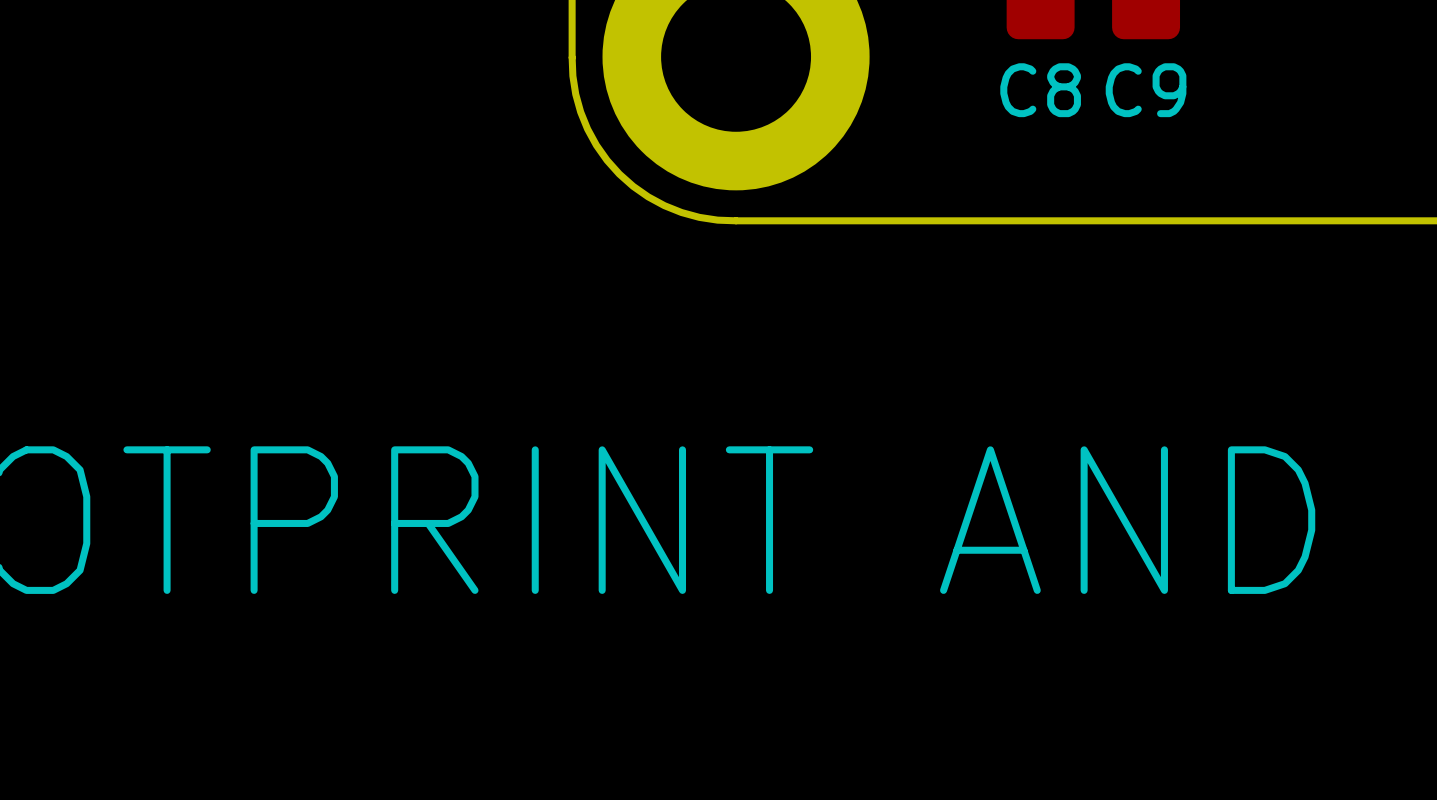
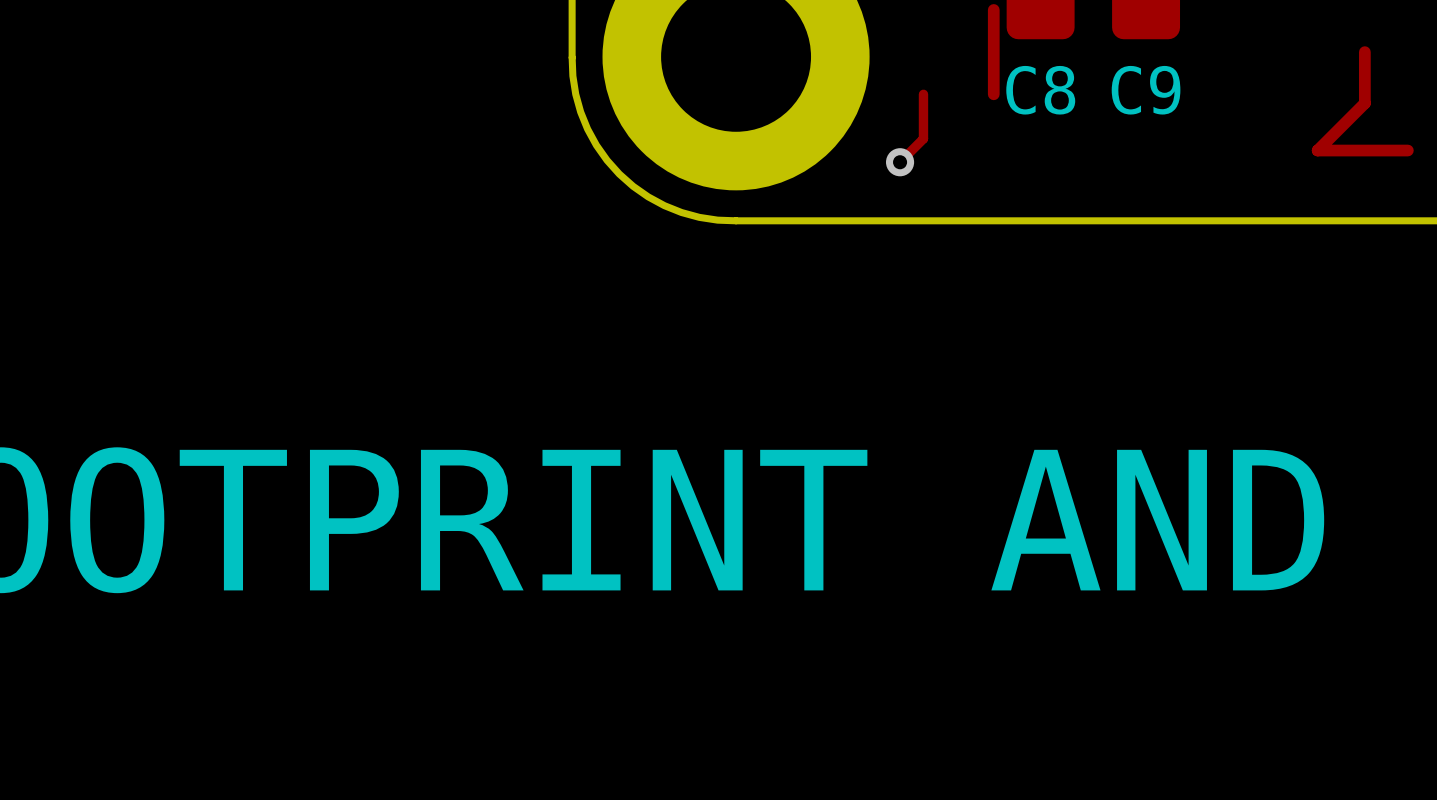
top track: none -> (993, 9) (993, 94)
top track: none -> (1364, 52) (1364, 103) (1317, 150) (1407, 150)
top track: none -> (923, 94) (923, 138) (900, 162)
via: none -> (900, 162)

